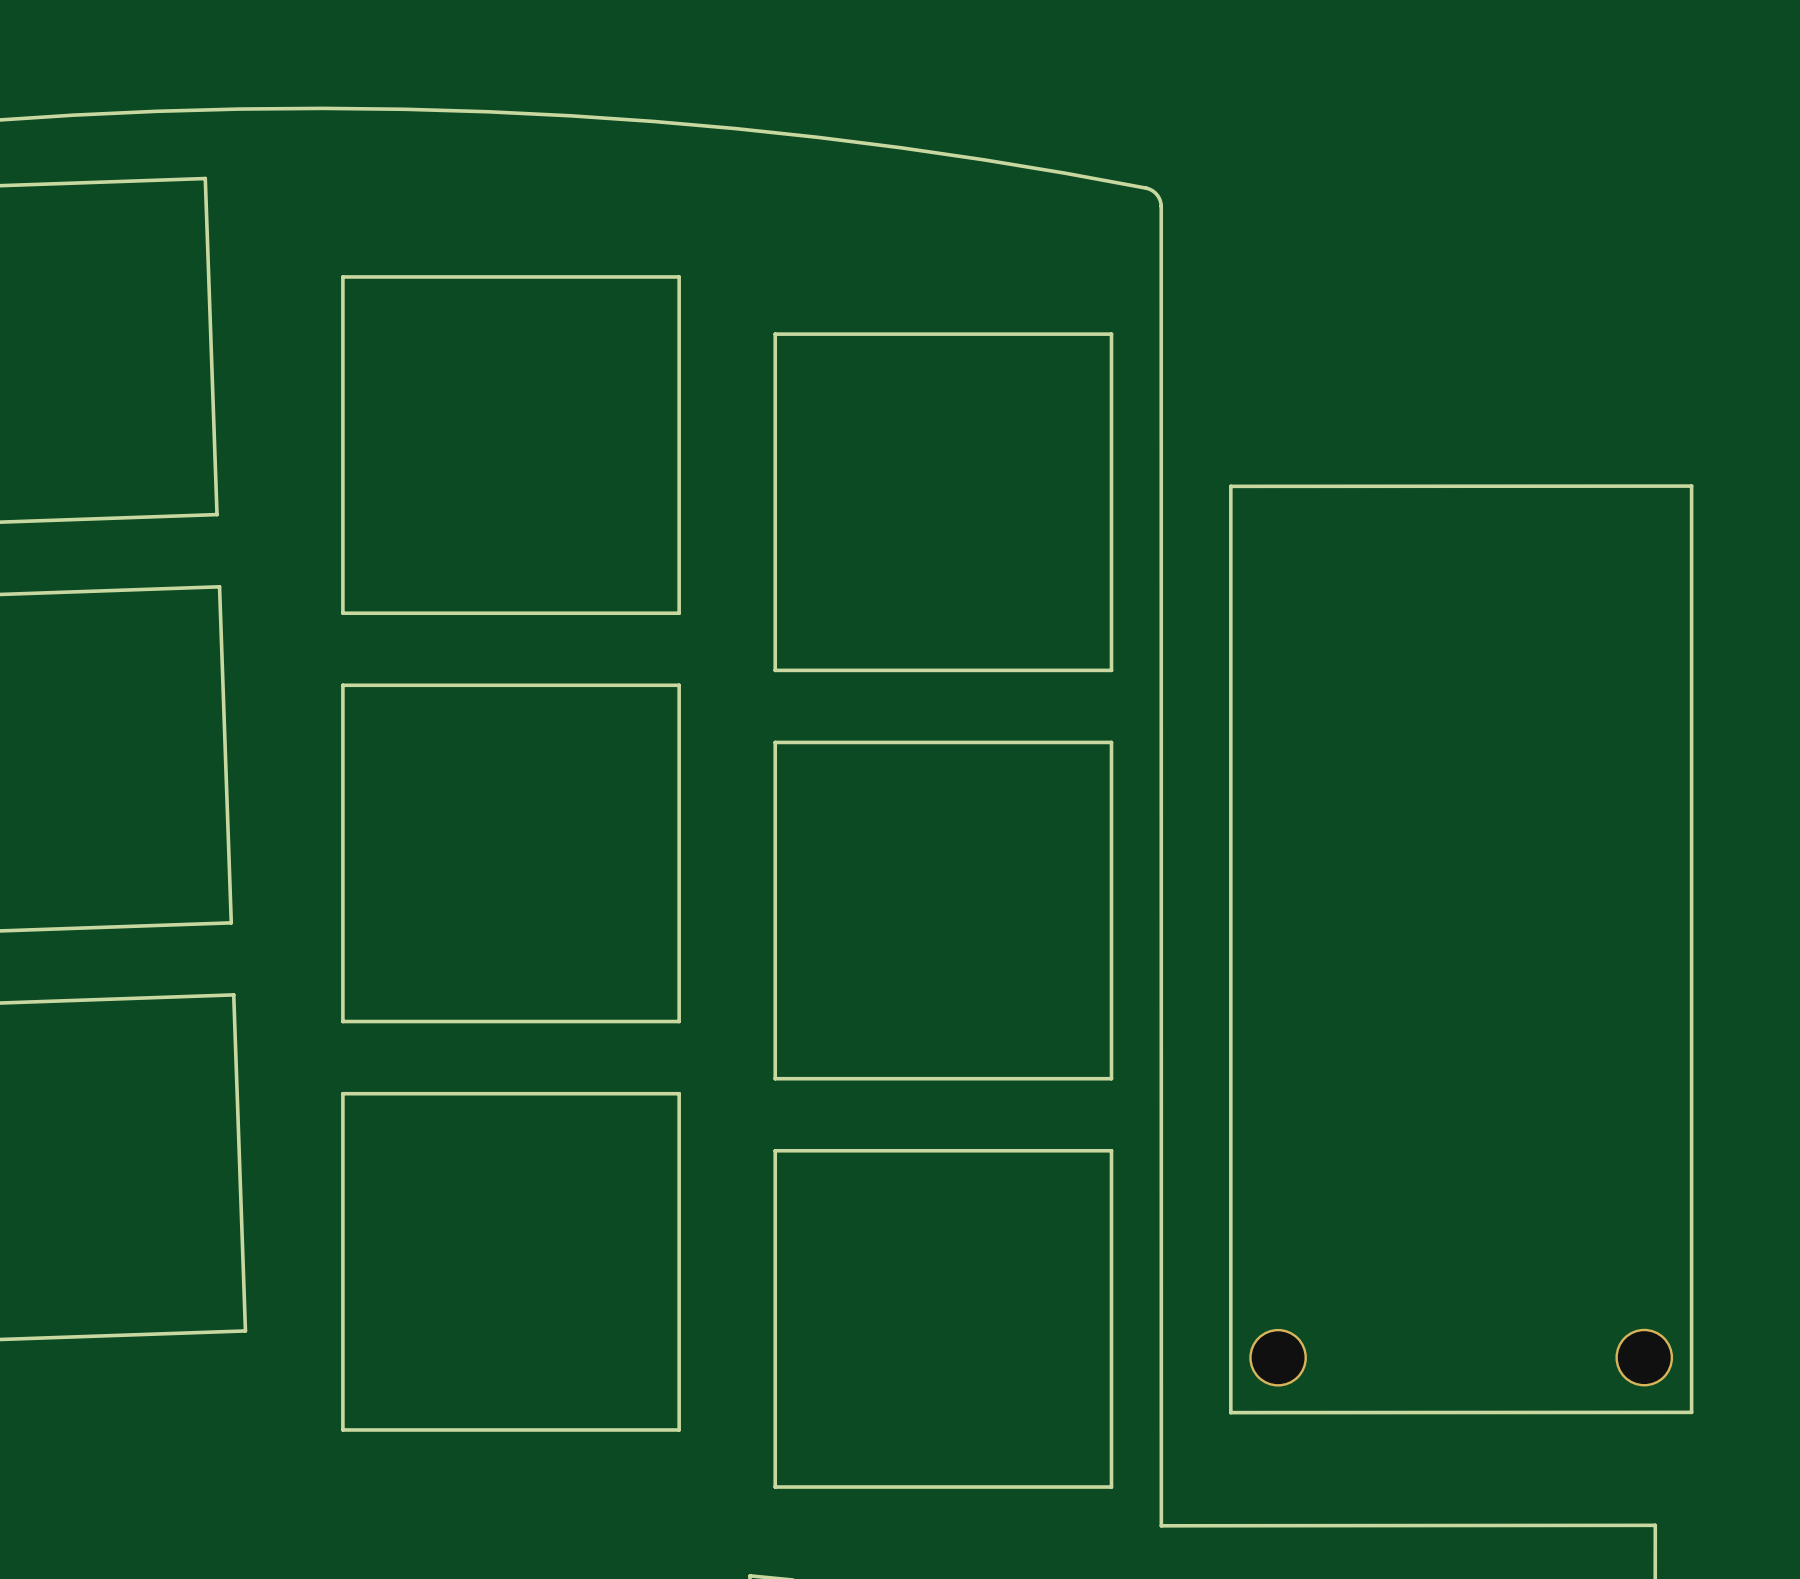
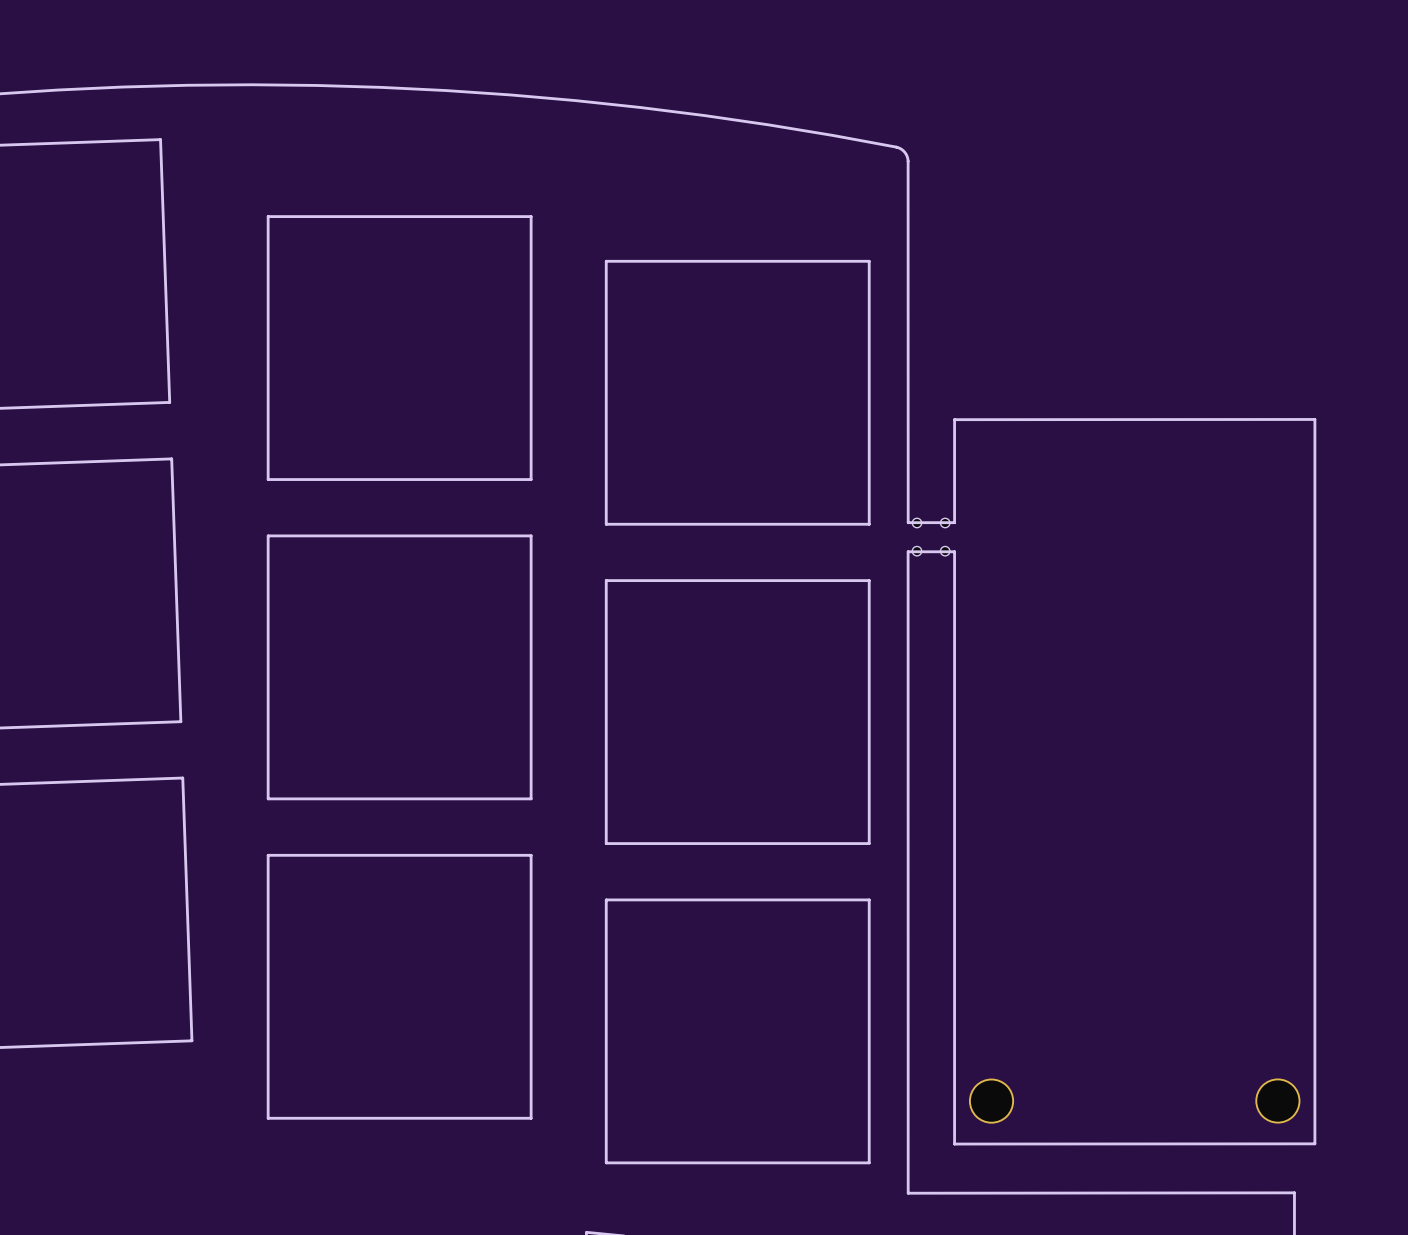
board edge: (1161, 206) (1161, 1525) -> (908, 551) (908, 1193)
board edge: none -> (908, 161) (908, 522) (954, 522) (954, 419) (1314, 419) (1314, 1143) (954, 1144) (954, 551) (908, 551)
board edge: (1691, 486) (1230, 486) (1230, 1412) (1691, 1412) (1691, 486) -> none
part: none -> (931, 537)
part position: (1278, 1357) -> (991, 1101)
part position: (1644, 1357) -> (1277, 1101)

